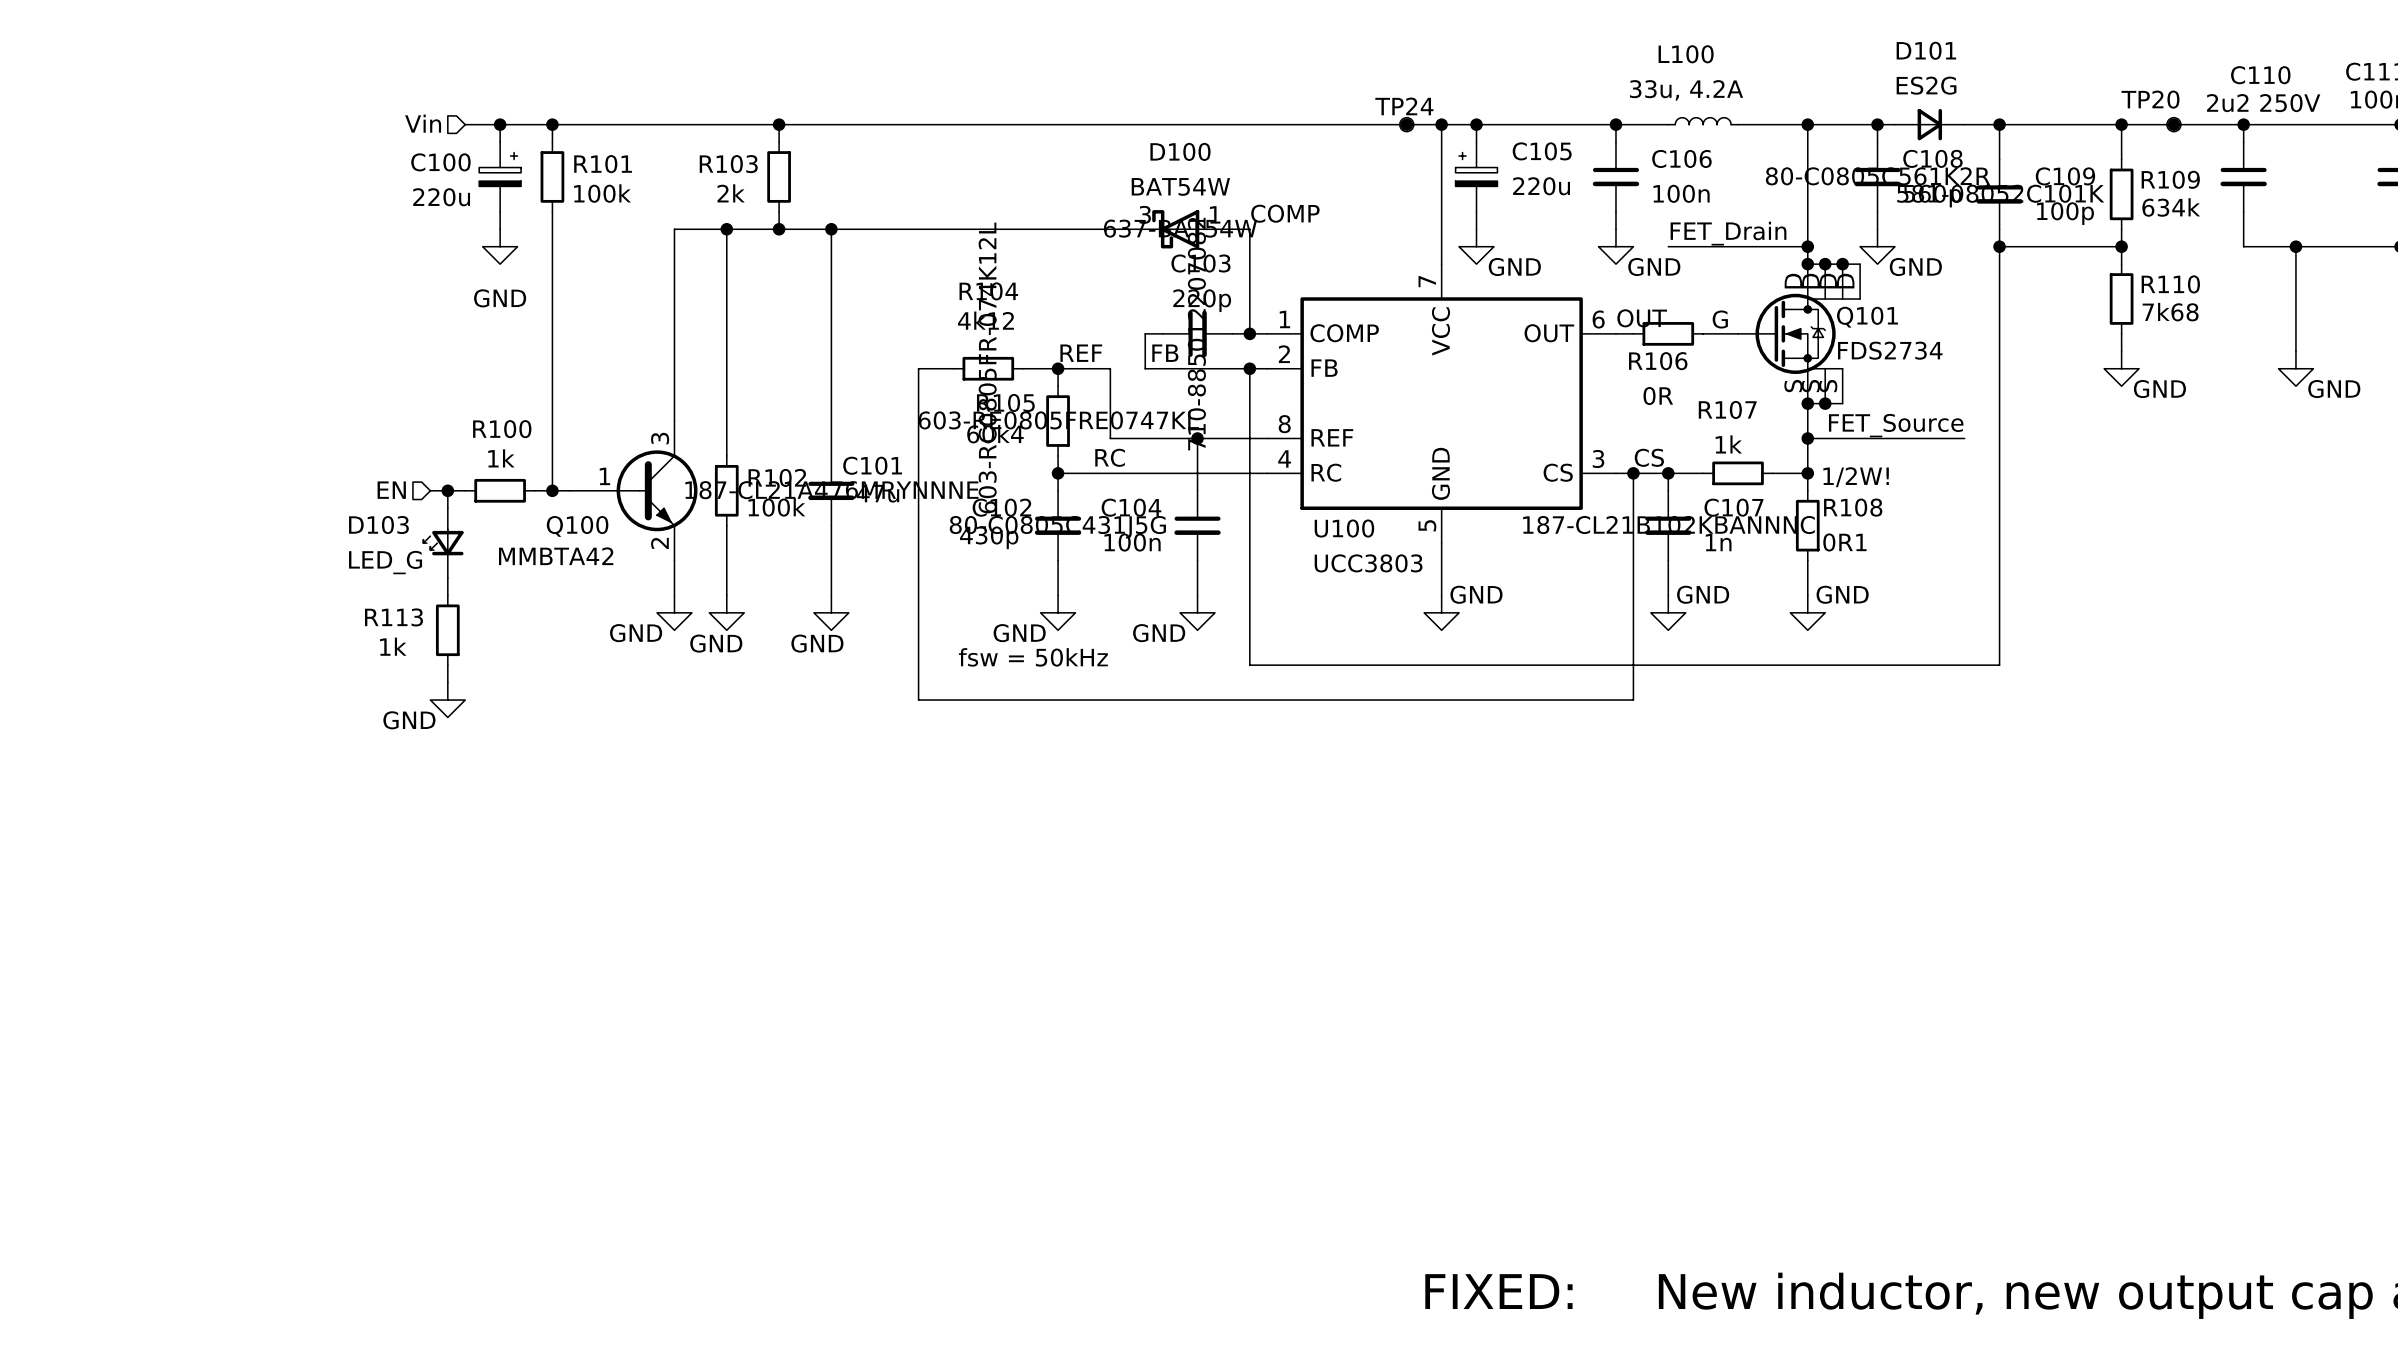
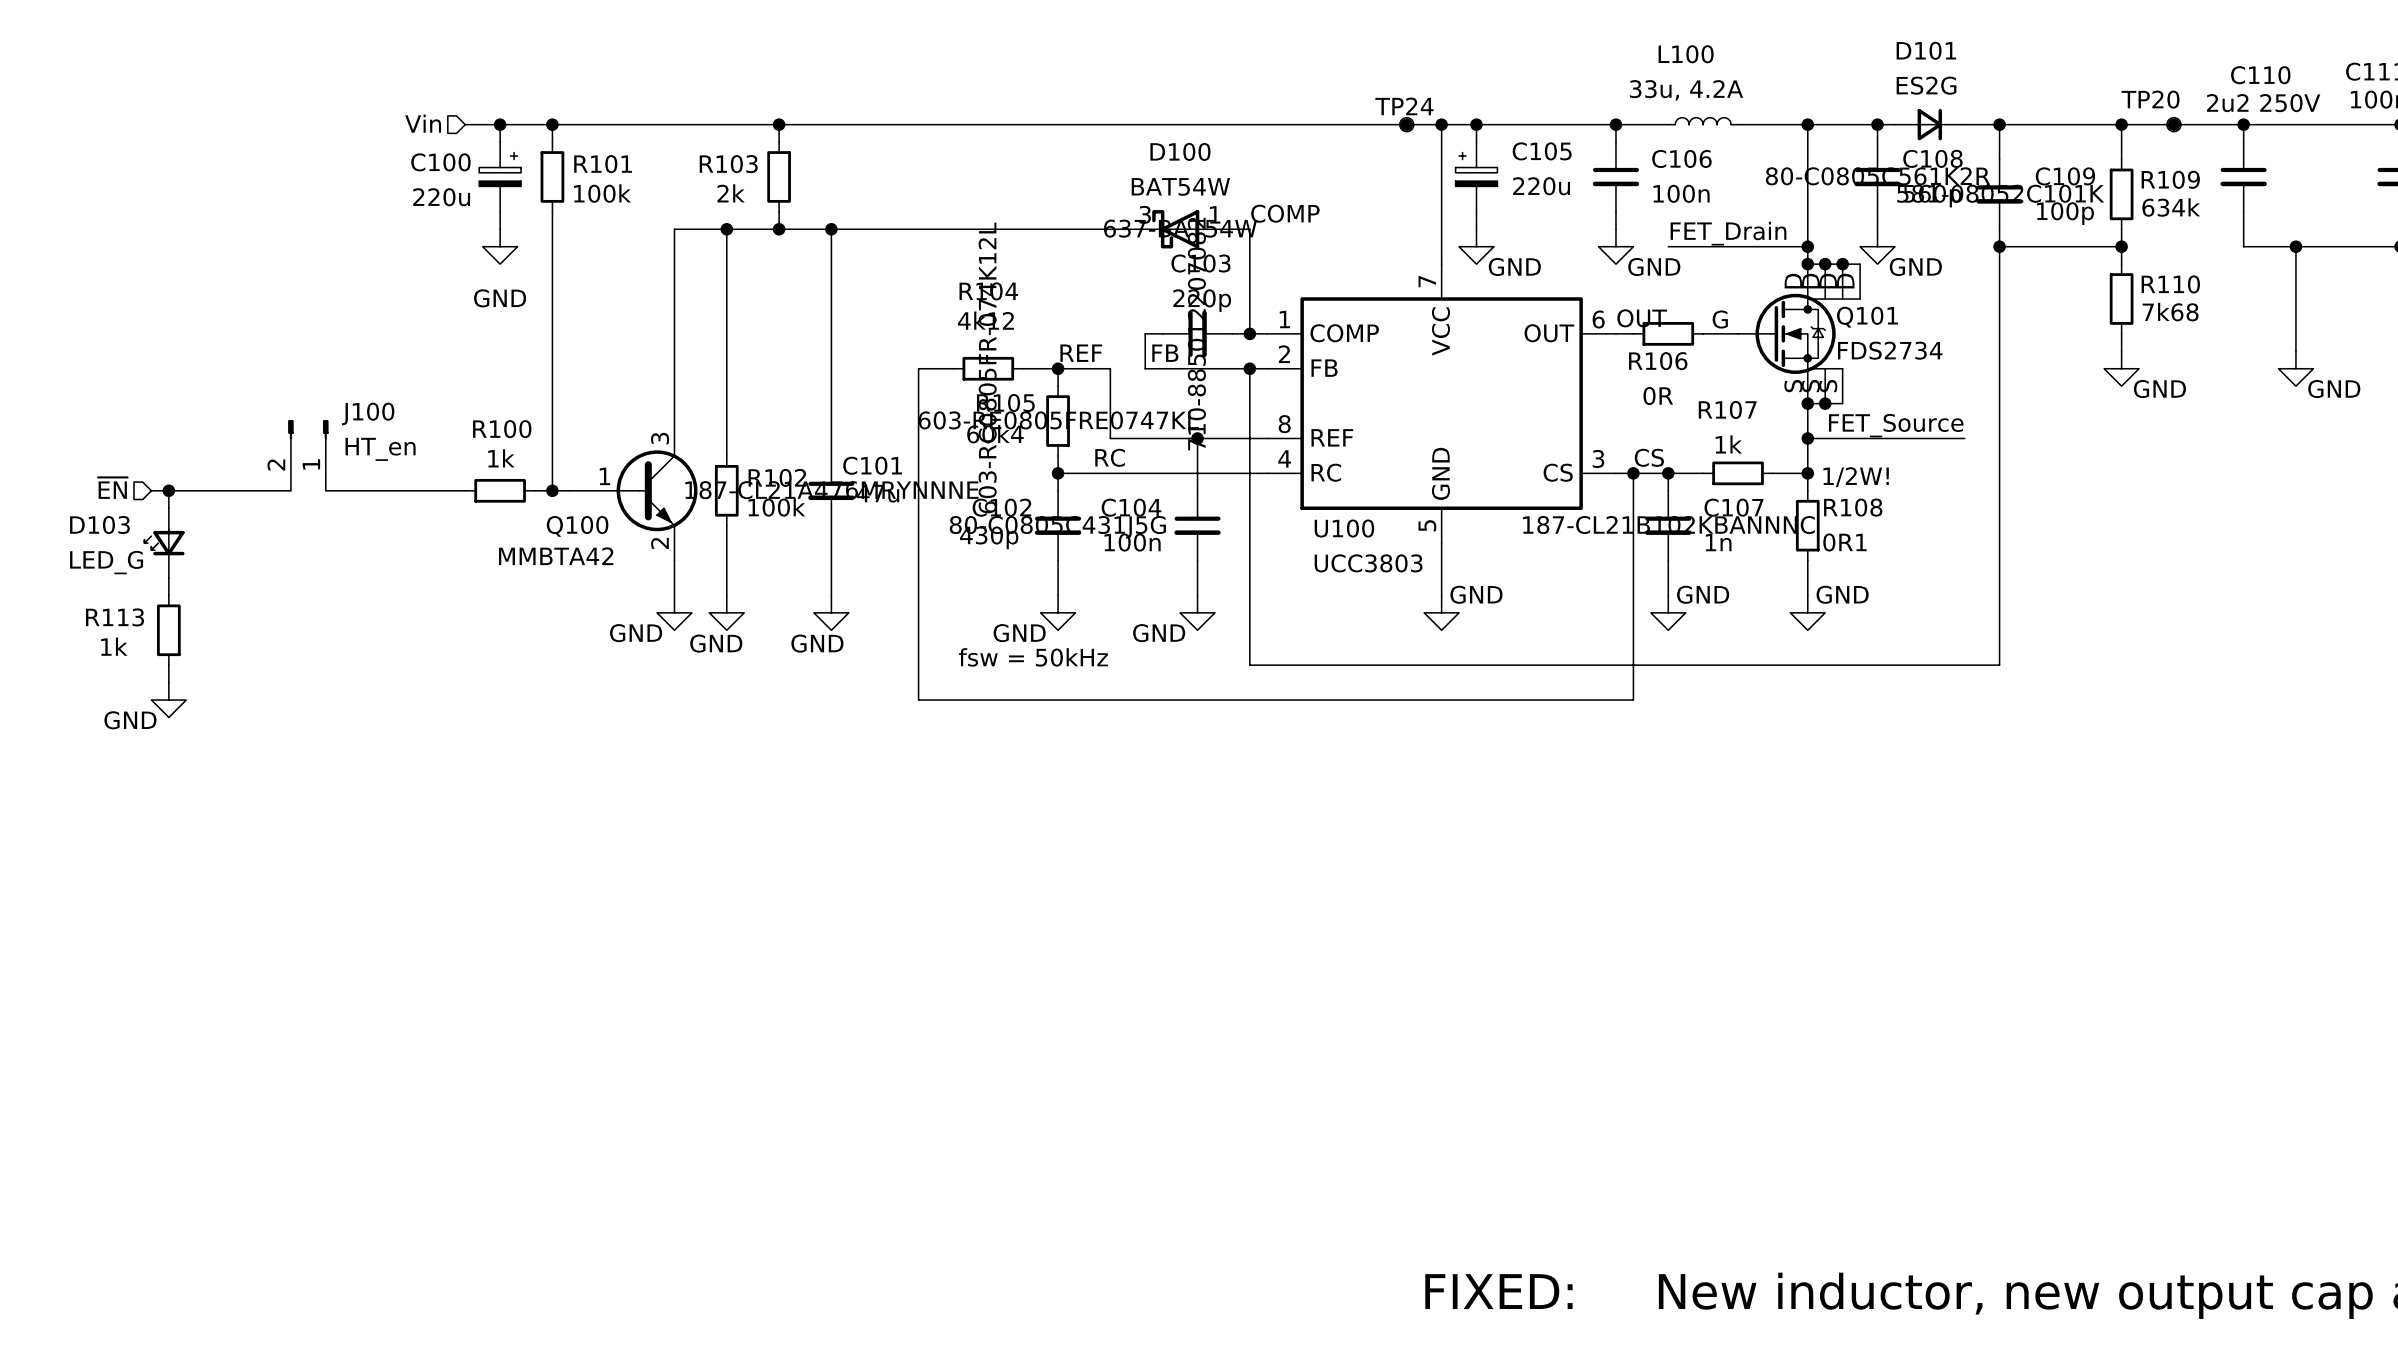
J100: none -> HT_en (308, 455)
hierarchical label: none -> ~{EN} (112, 488)
wire: none -> (151, 490) (290, 490)
junction: none -> (168, 490)
wire: none -> (325, 490) (430, 490)
hierarchical label: EN (391, 490) -> none
wire: (447, 490) (447, 508) -> (168, 490) (168, 508)
junction: (447, 490) -> none
D103 position: (443, 543) -> (164, 543)
wire: (447, 577) (447, 595) -> (168, 577) (168, 595)
R113 position: (447, 630) -> (168, 630)
wire: (447, 665) (447, 682) -> (168, 665) (168, 682)
power symbol position: GND (447, 700) -> GND (168, 700)

